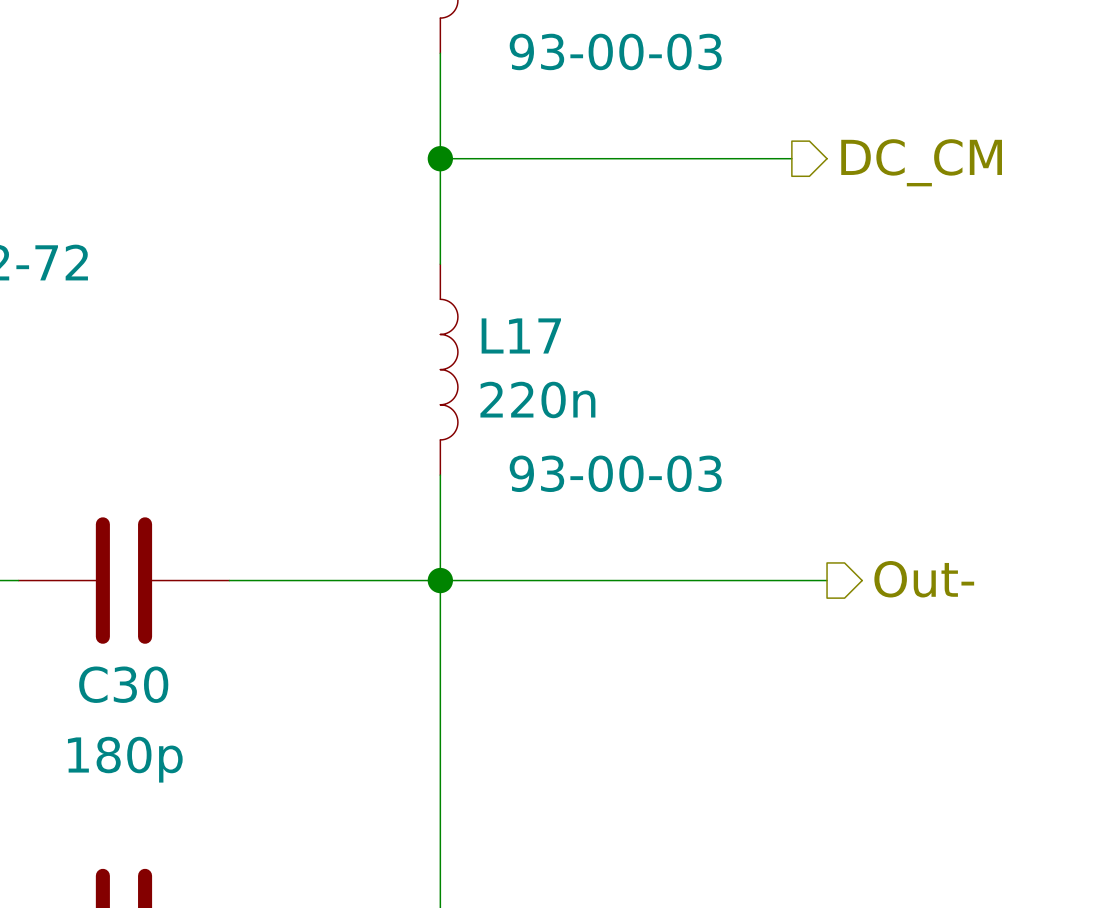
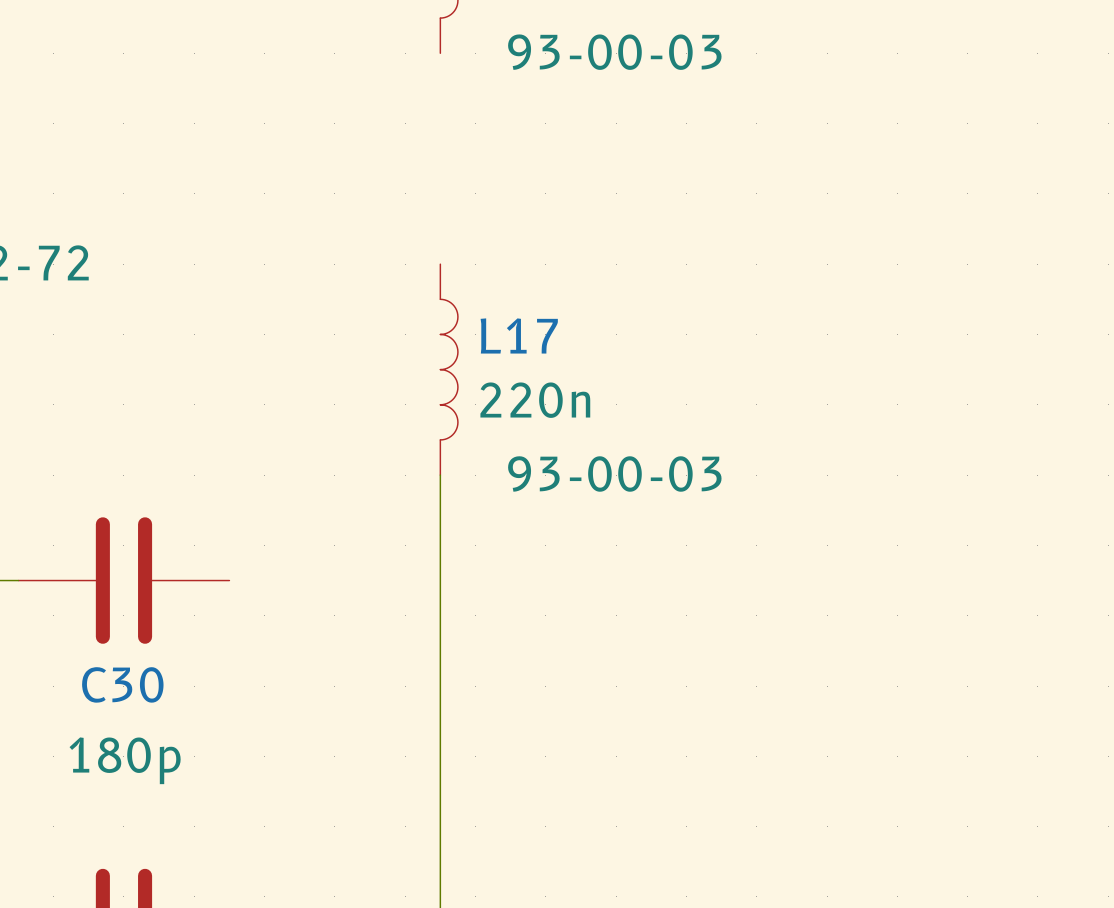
wire: (440, 53) (440, 264) -> none
wire: (440, 158) (791, 158) -> none
junction: (440, 158) -> none
hierarchical label: DC_CM (921, 162) -> none
hierarchical label: Out- (924, 579) -> none
wire: (229, 580) (827, 580) -> none
junction: (440, 580) -> none

